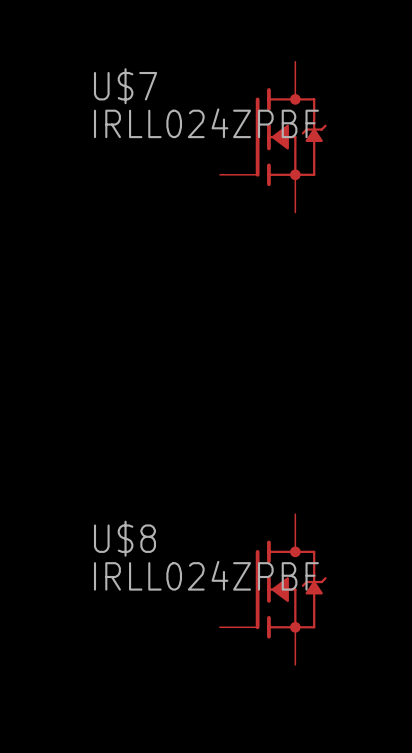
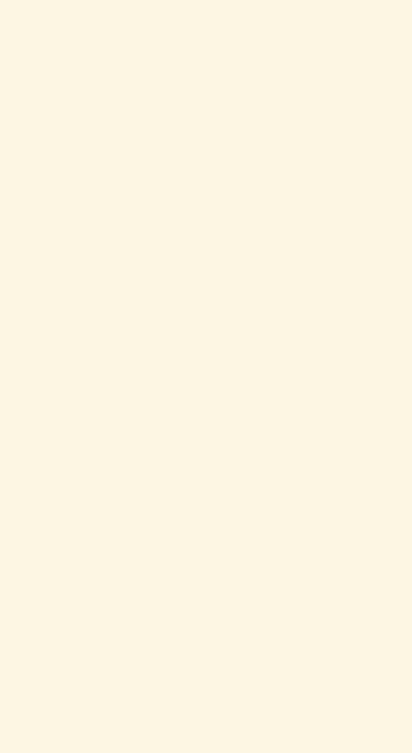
U$7: IRLL024ZPBF (273, 137) -> none
U$8: IRLL024ZPBF (273, 589) -> none

